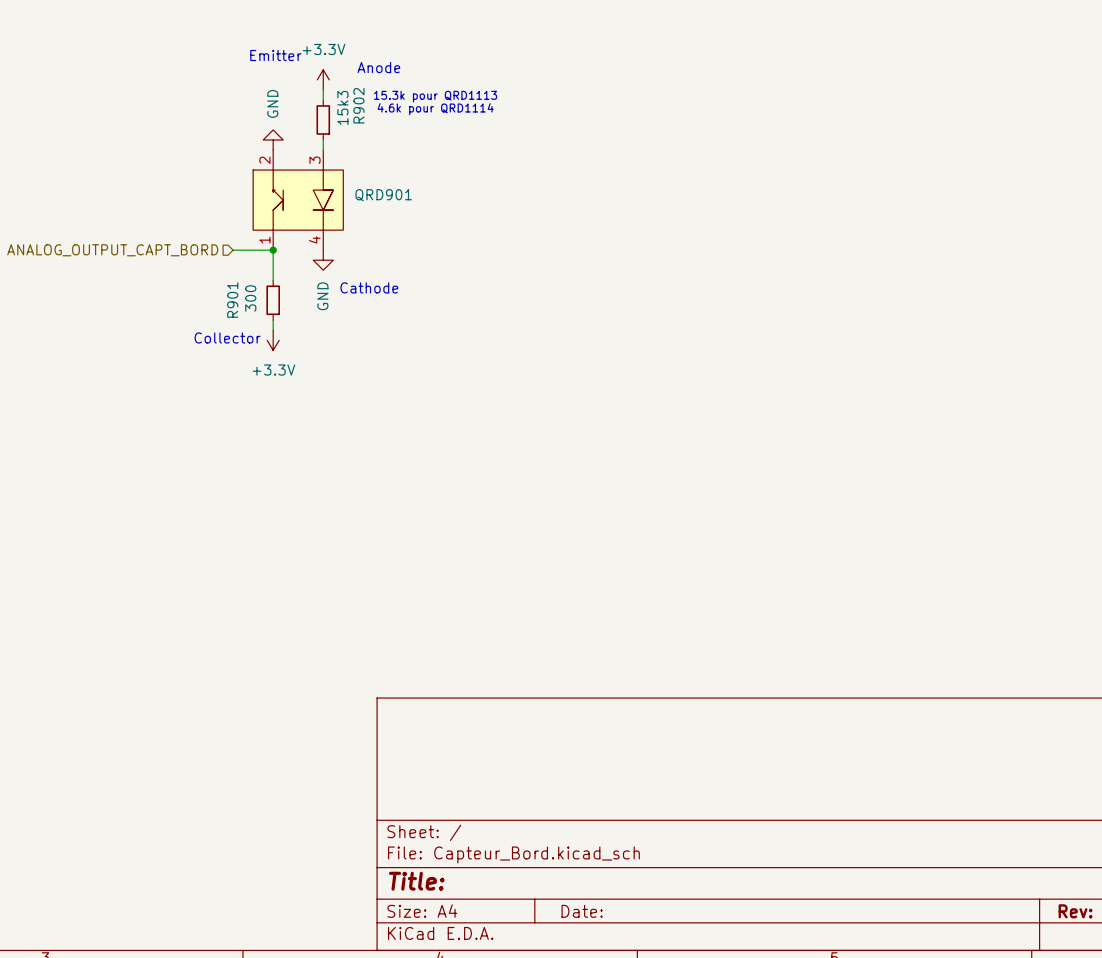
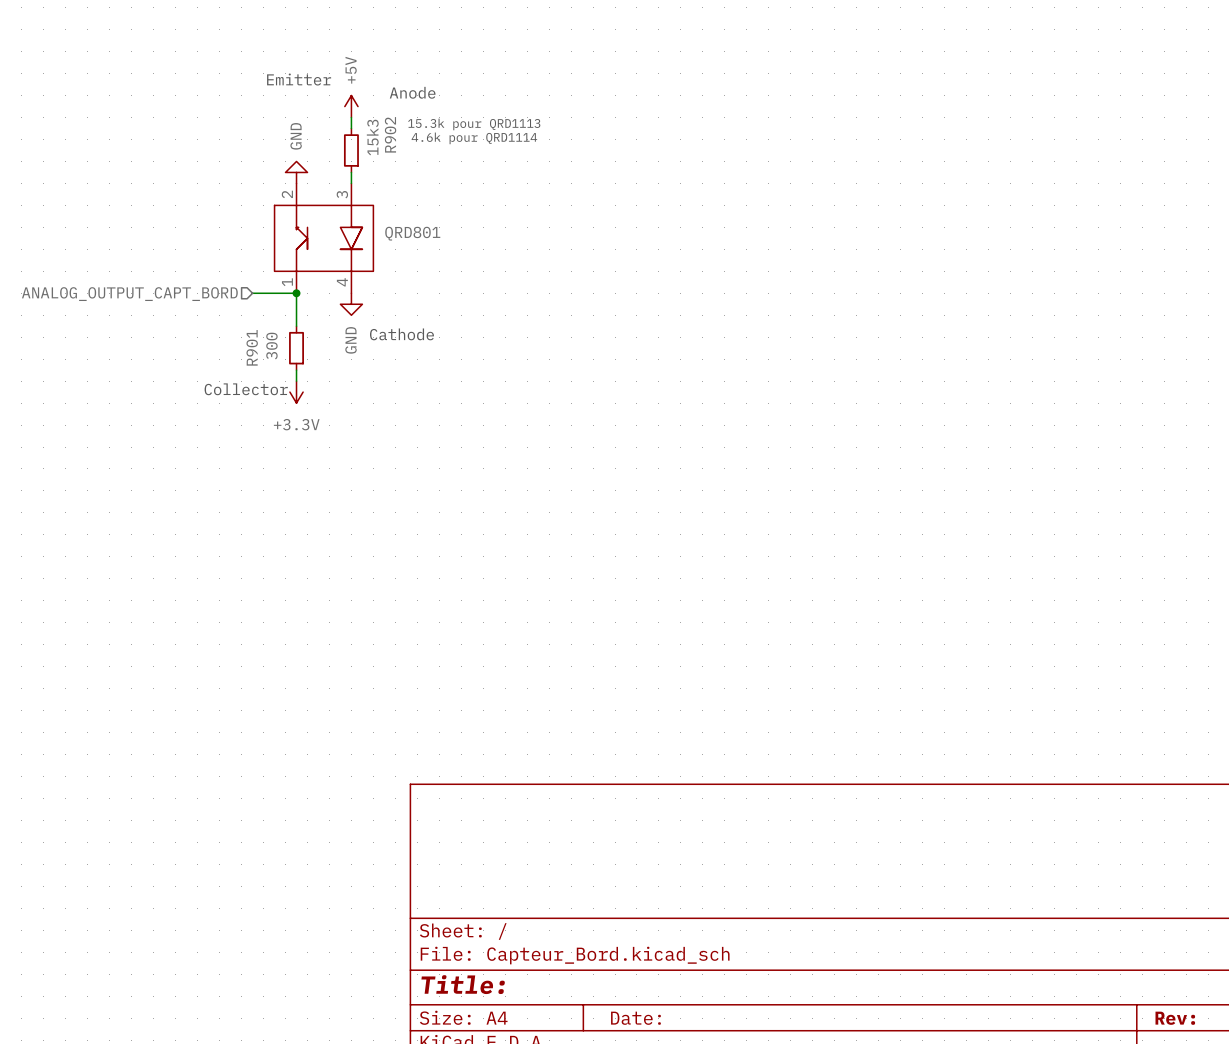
power symbol: +3.3V (323, 79) -> +5V (351, 106)
QRD901 name: QRD901 (383, 195) -> QRD801 (412, 233)

